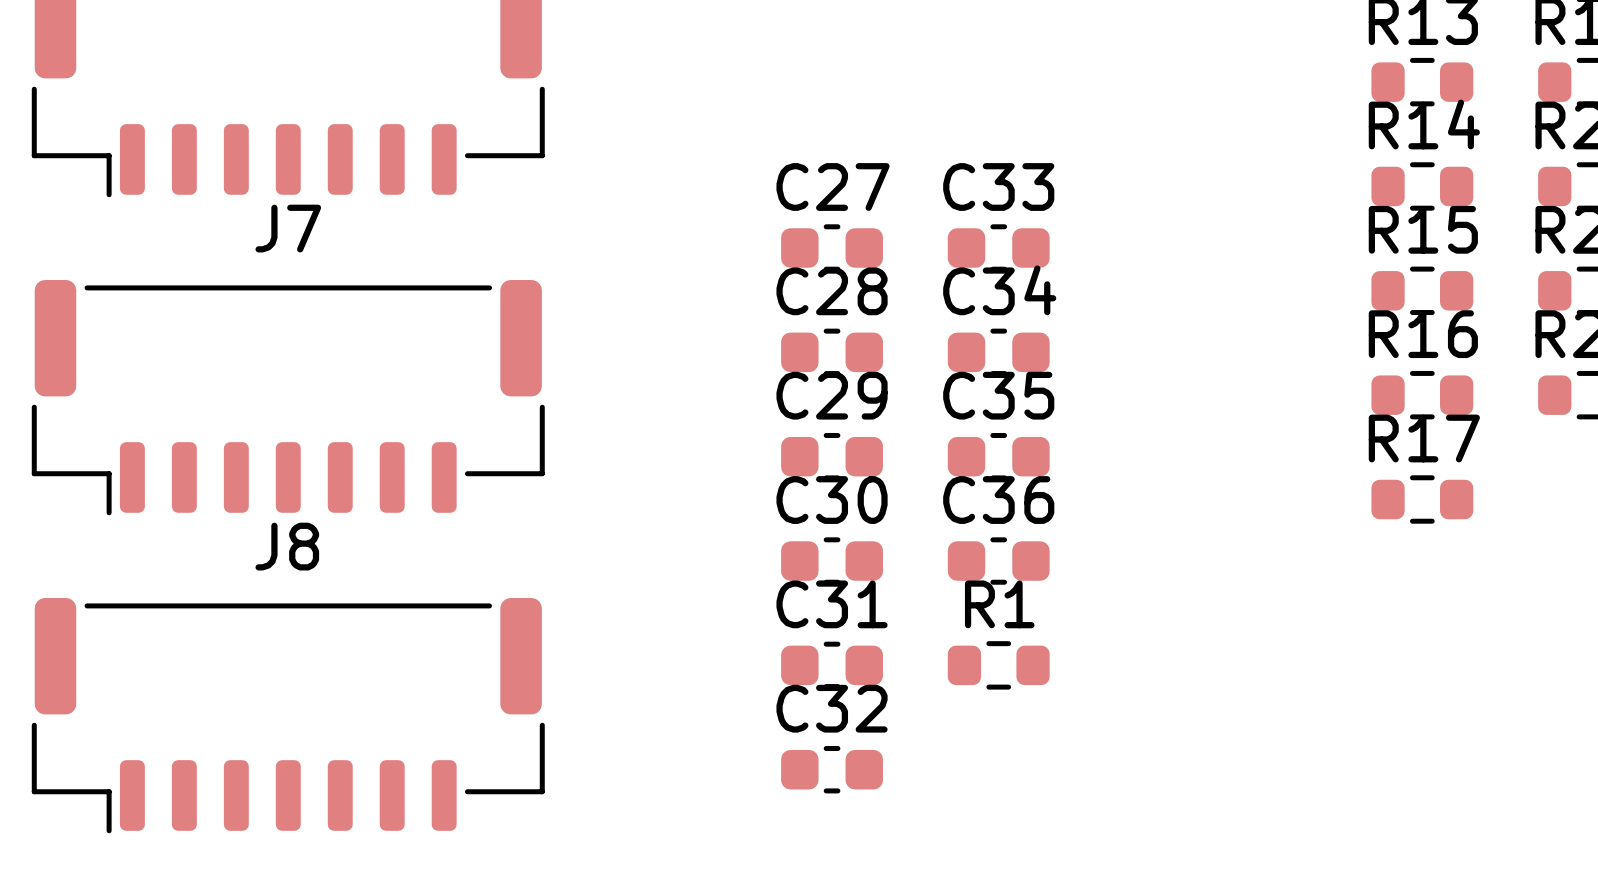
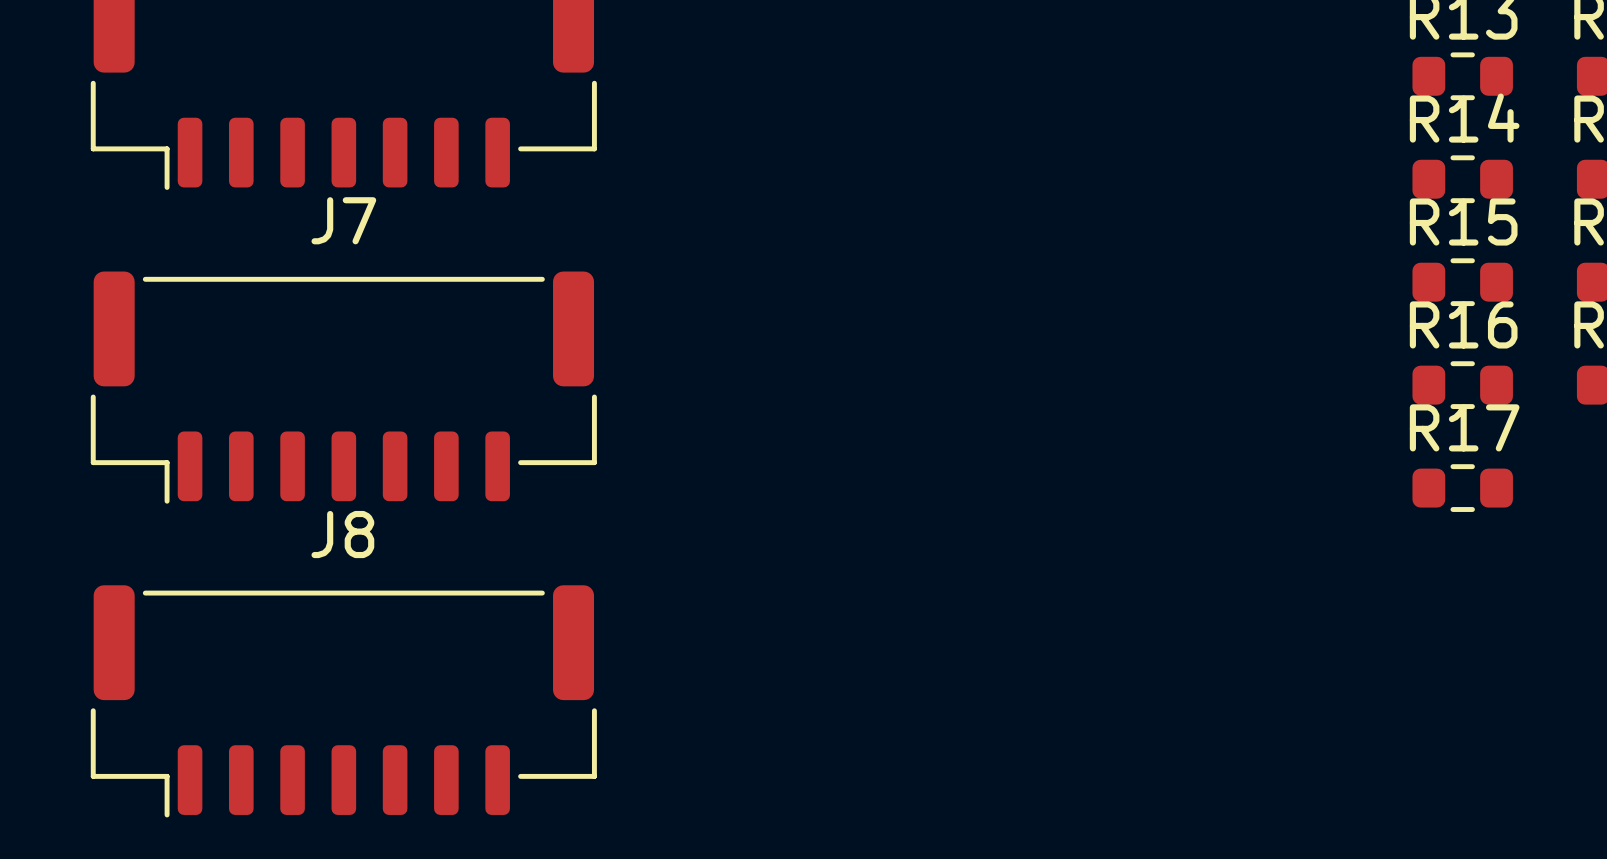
C27: (832, 247) -> none
C33: (998, 247) -> none
C28: (832, 352) -> none
C34: (998, 352) -> none
C29: (832, 456) -> none
C35: (998, 456) -> none
C30: (832, 561) -> none
C36: (998, 561) -> none
C31: (832, 665) -> none
R1: (998, 665) -> none
C32: (832, 769) -> none

